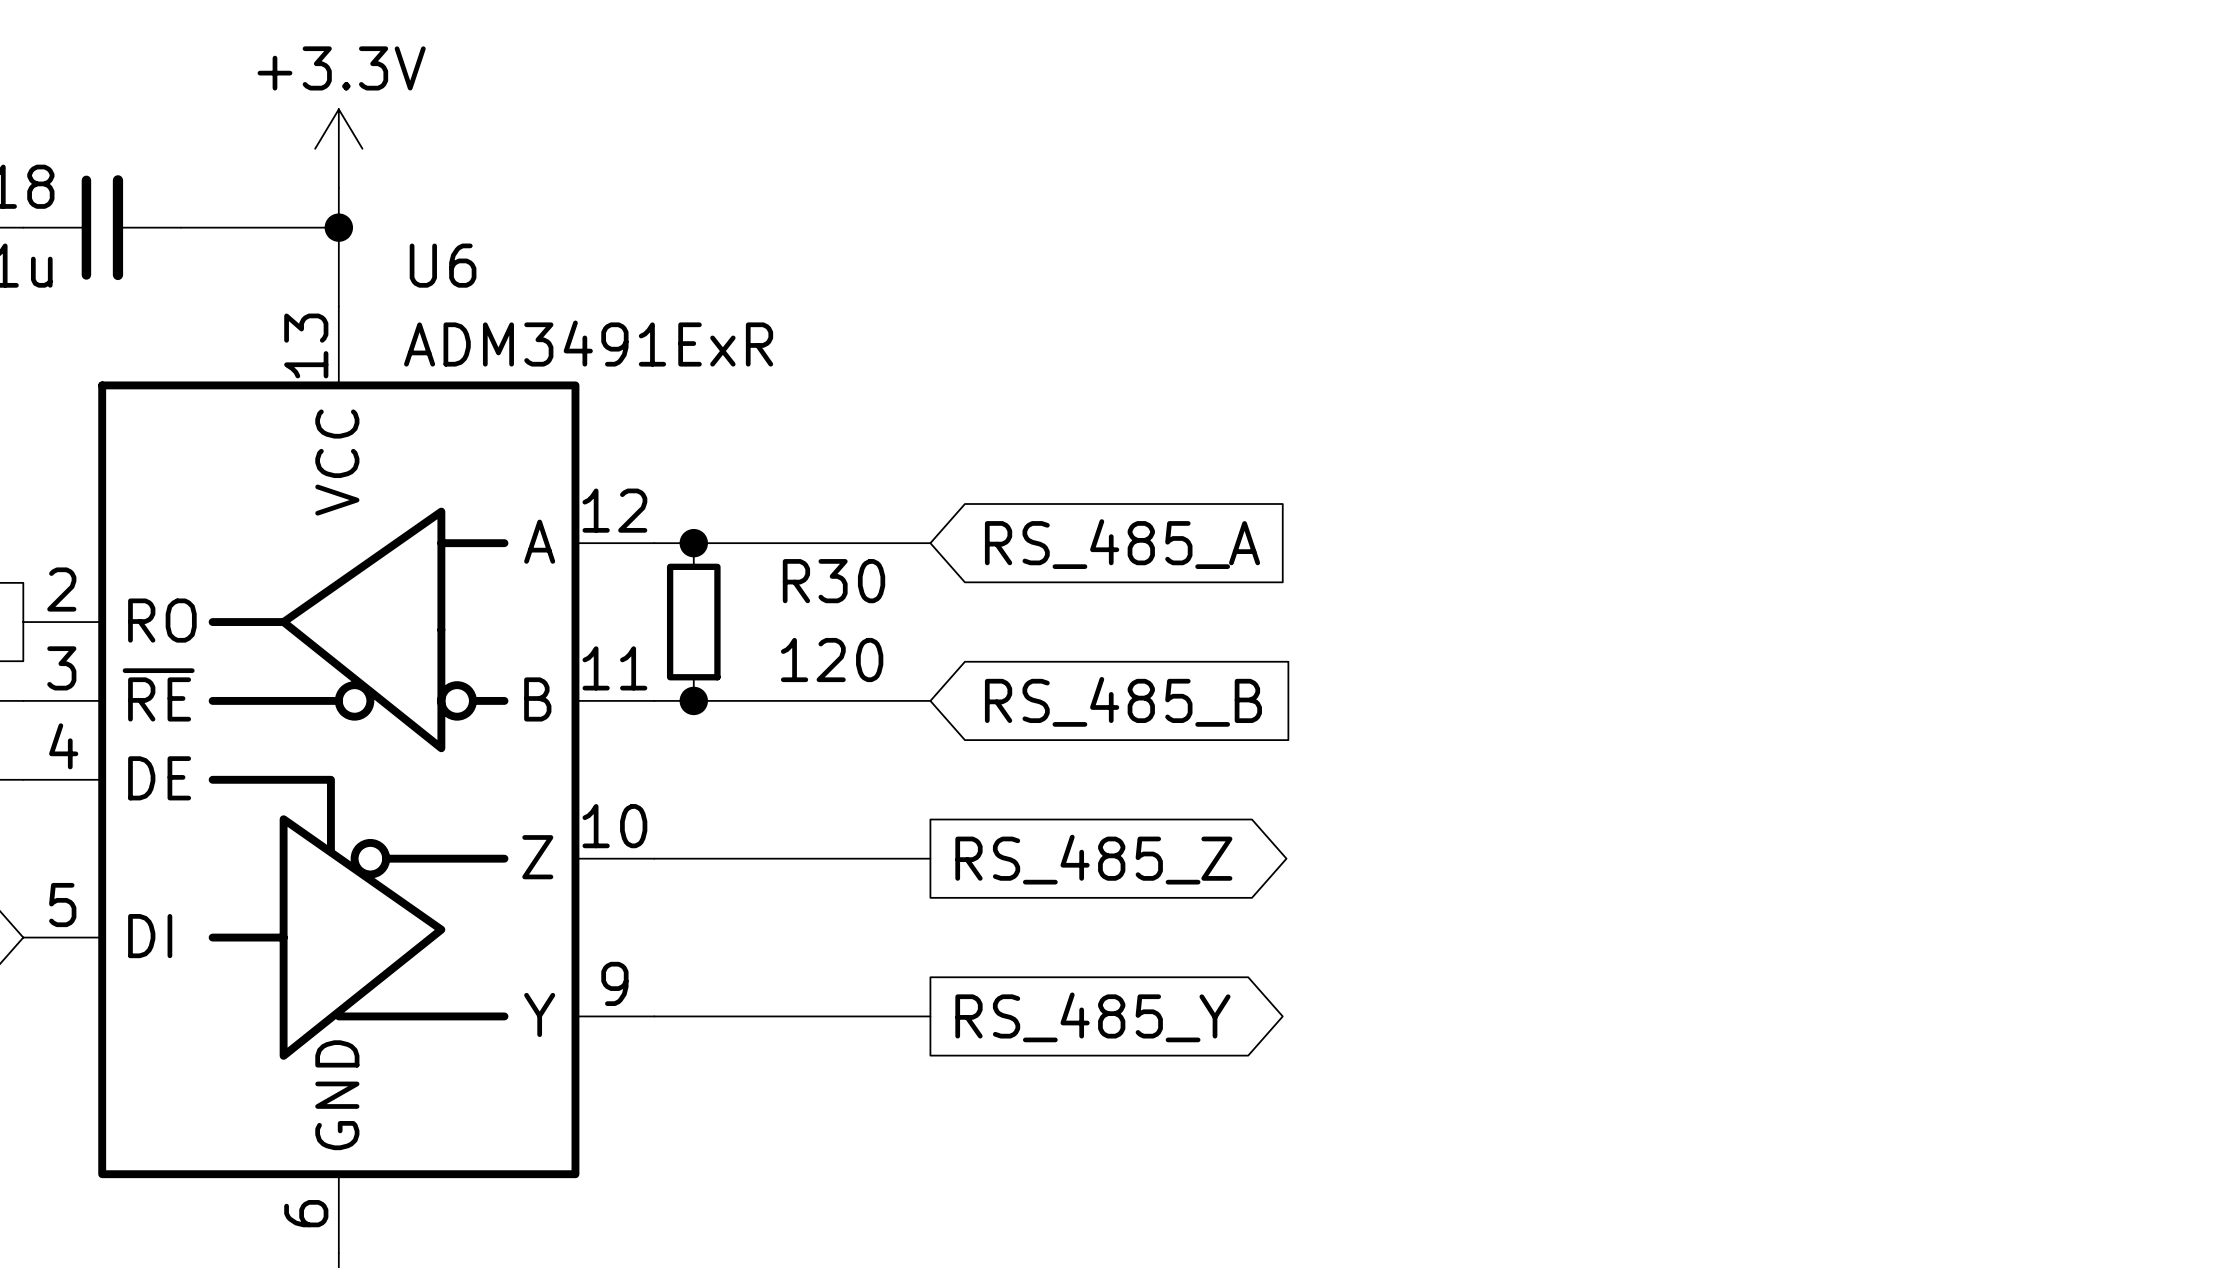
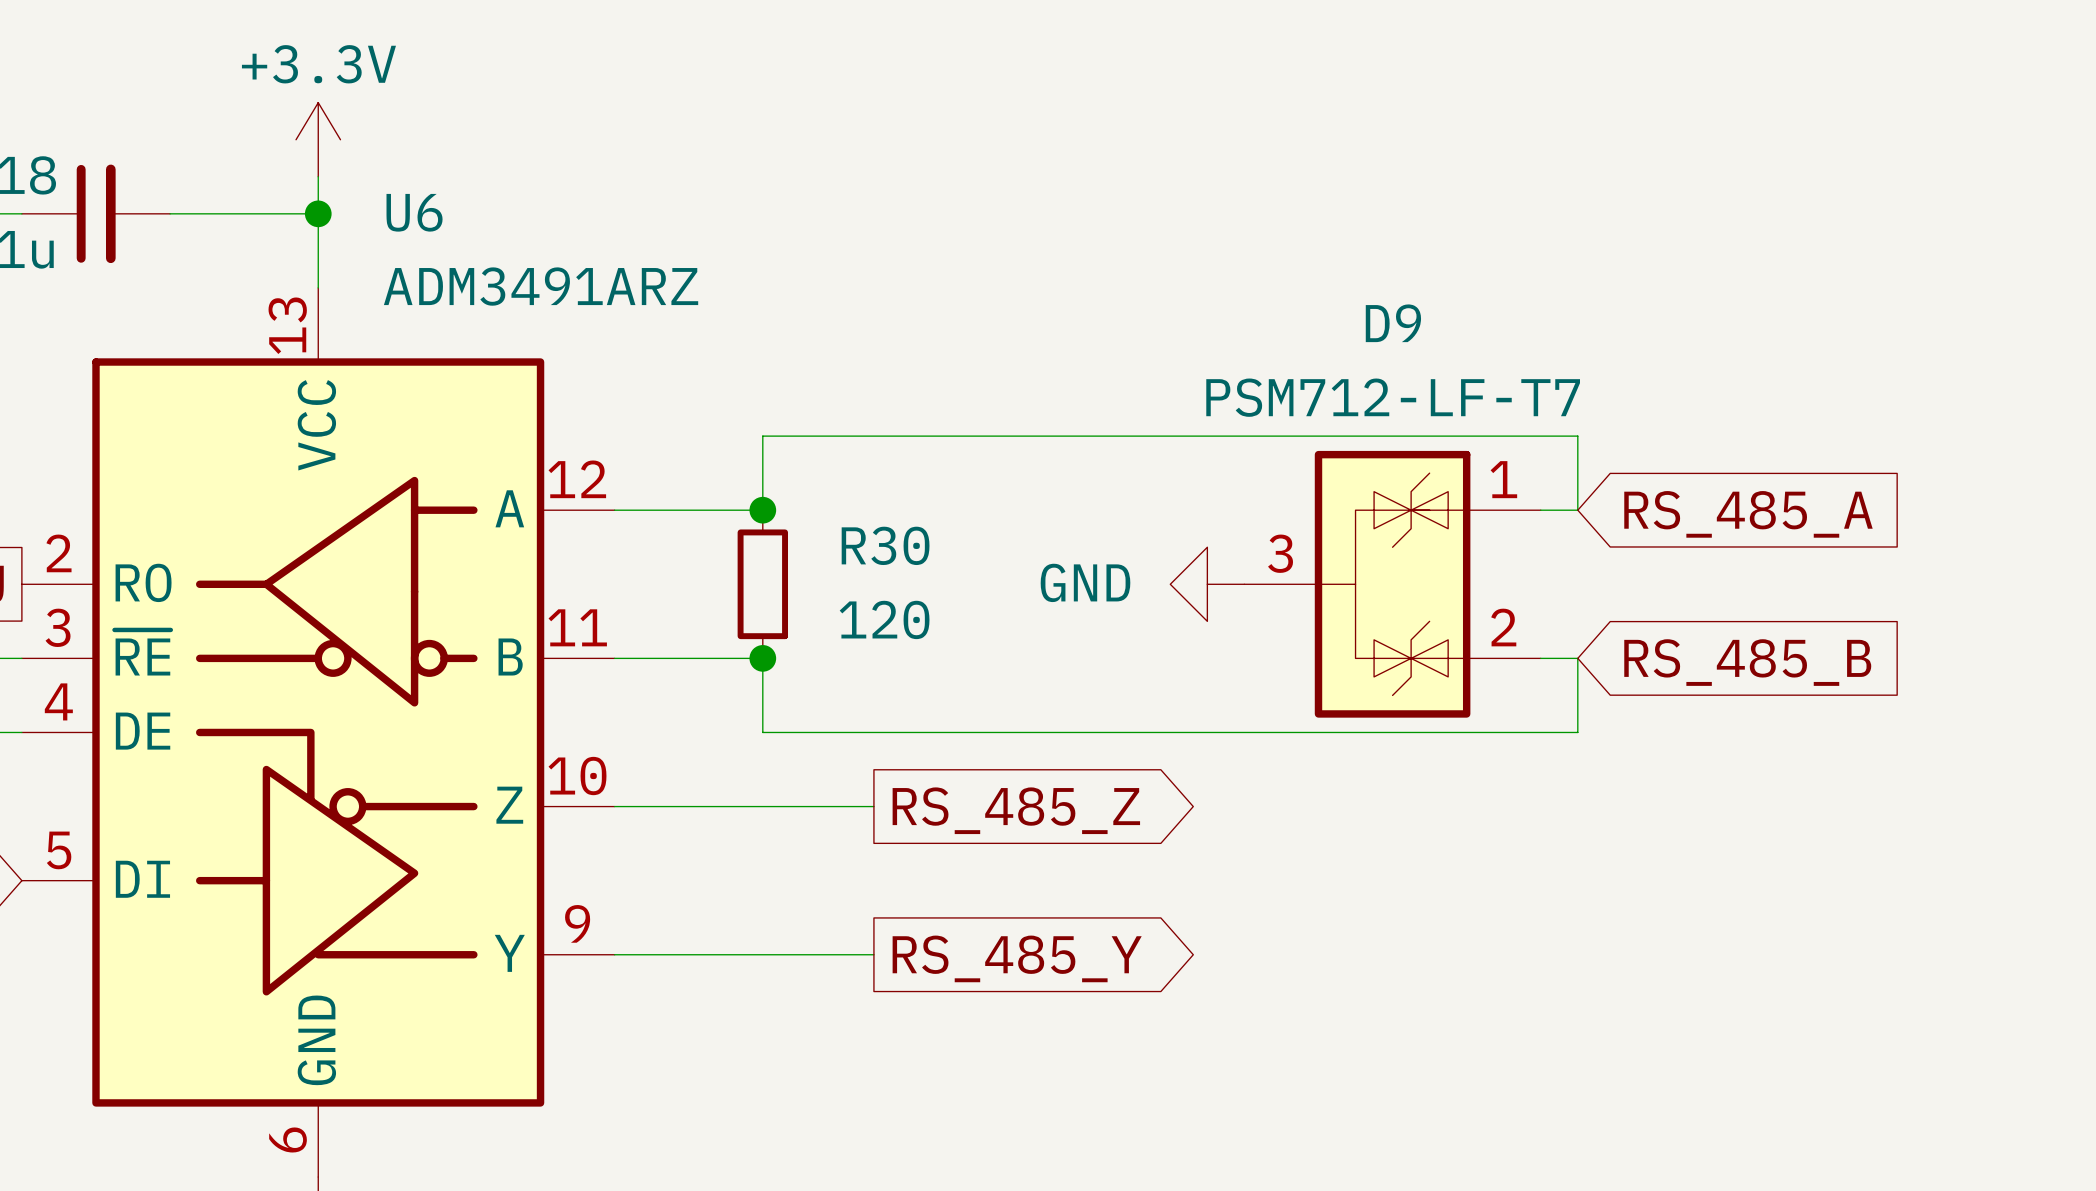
U6 name position: U6 (443, 265) -> U6 (414, 212)
U6 value: ADM3491ExR (588, 343) -> ADM3491ARZ (541, 286)
junction: (693, 543) -> none
wire: (812, 543) (930, 543) -> (762, 510) (762, 436) (1577, 436) (1577, 510) (1540, 510)
junction: none -> (762, 510)
global label position: RS_485_A (1122, 544) -> RS_485_A (1748, 514)
R30 position: (693, 622) -> (762, 584)
power symbol: none -> GND (1207, 584)
D9: none -> PSM712-LF-T7 (1392, 584)
junction: (693, 700) -> none
wire: (812, 700) (930, 700) -> (762, 658) (762, 732) (1577, 732) (1577, 658) (1540, 658)
junction: none -> (762, 658)
global label position: RS_485_B (1123, 701) -> RS_485_B (1747, 662)

